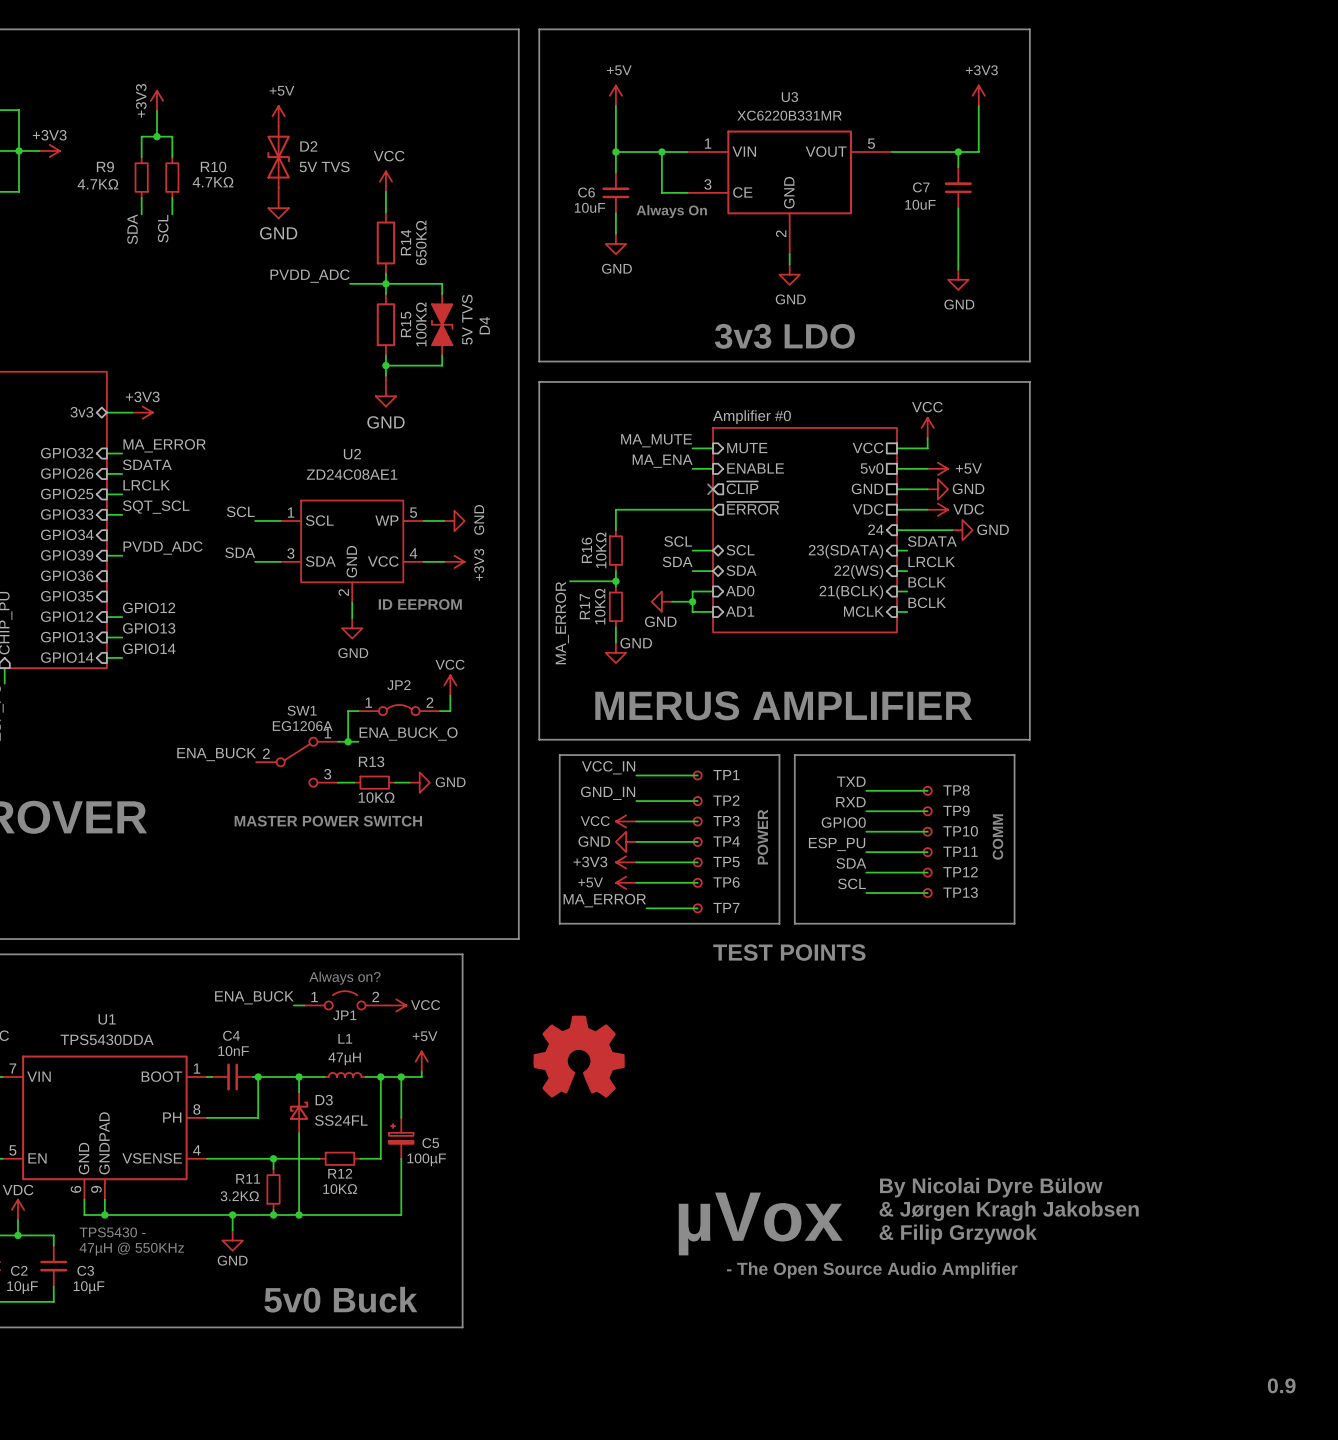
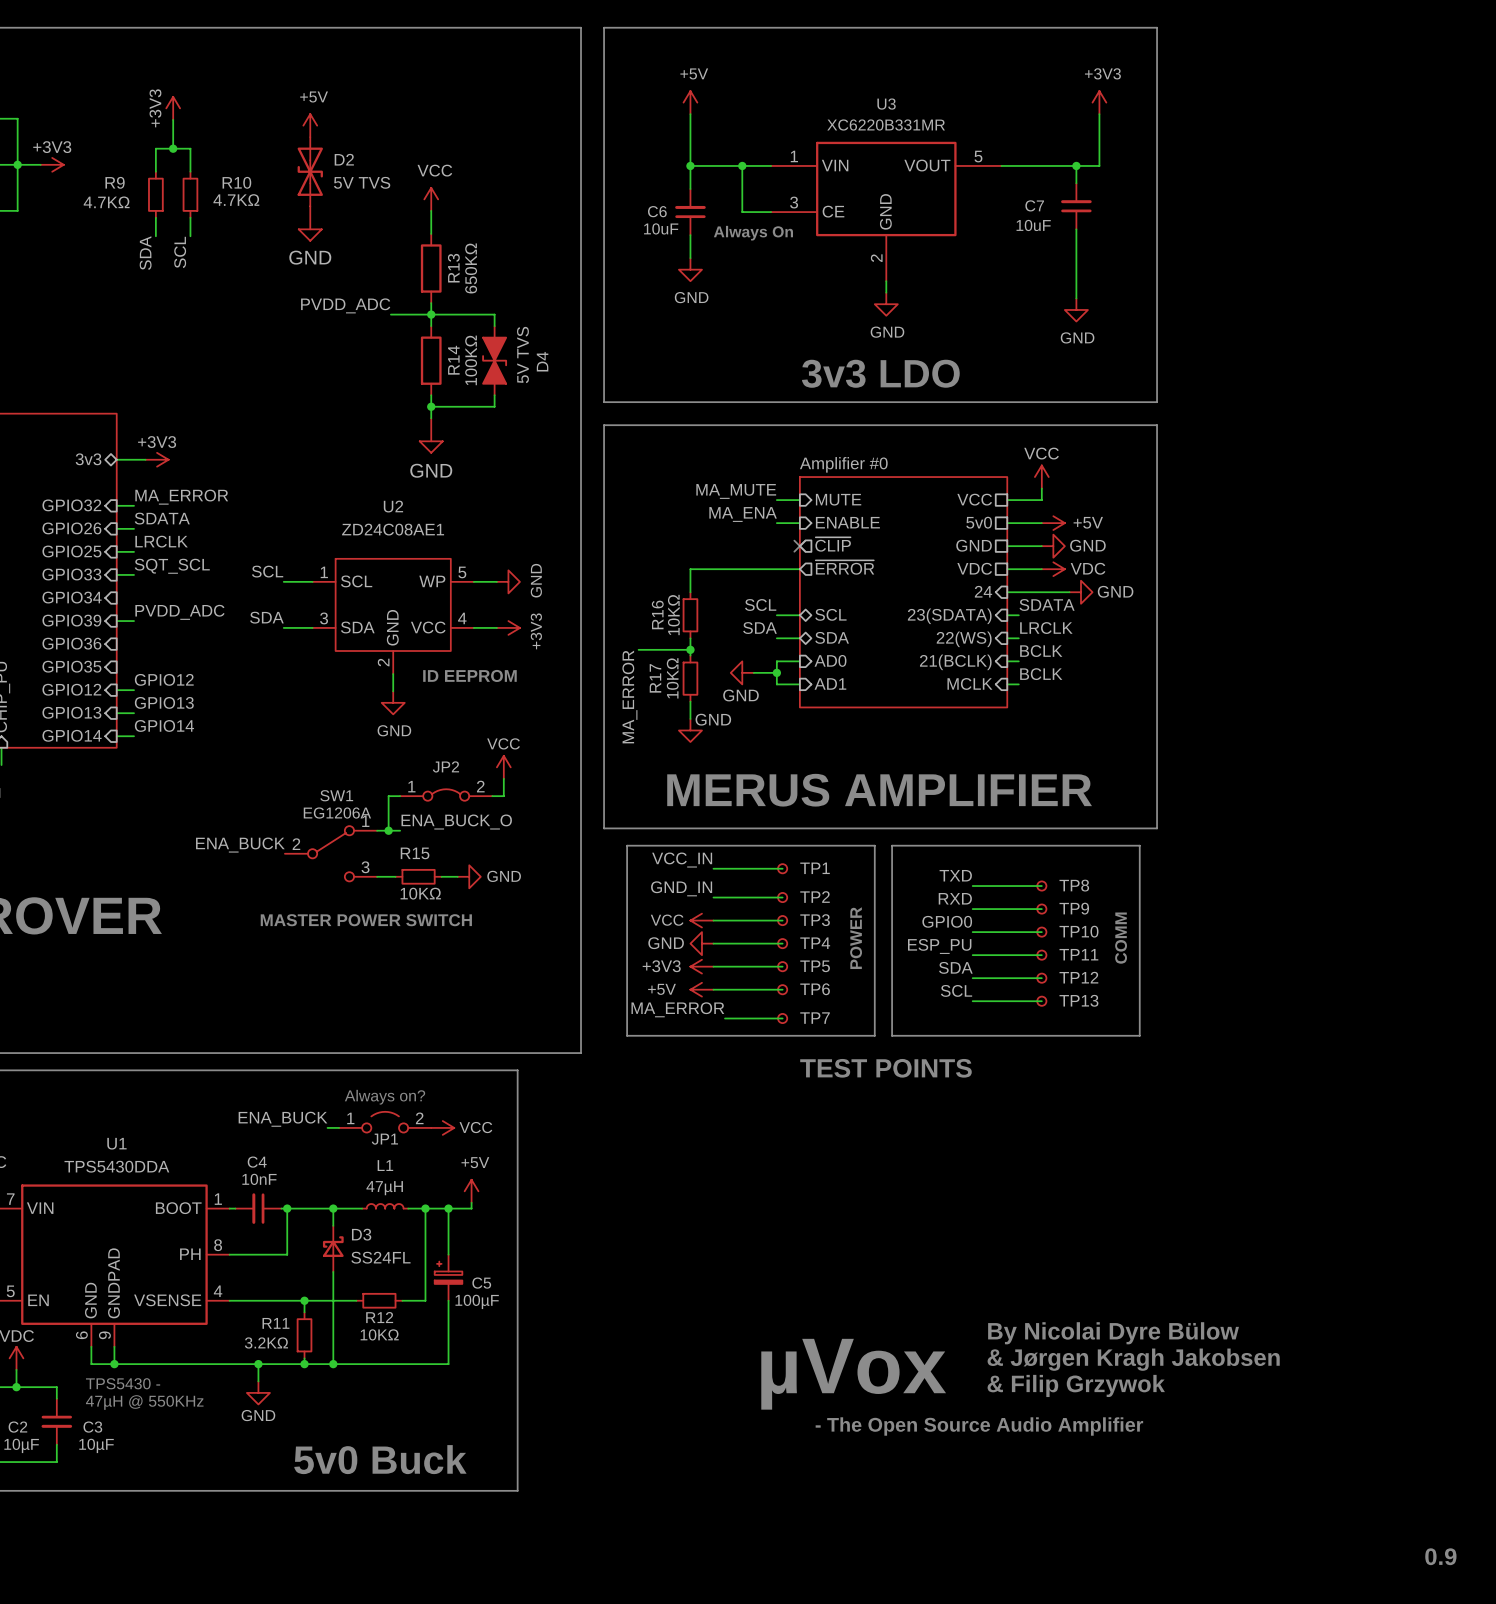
R14 name: R14 (406, 242) -> R13 (453, 268)
R15 name: R15 (406, 324) -> R14 (453, 360)
R13 name: R13 (371, 761) -> R15 (415, 853)
power symbol: (579, 1056) -> none

